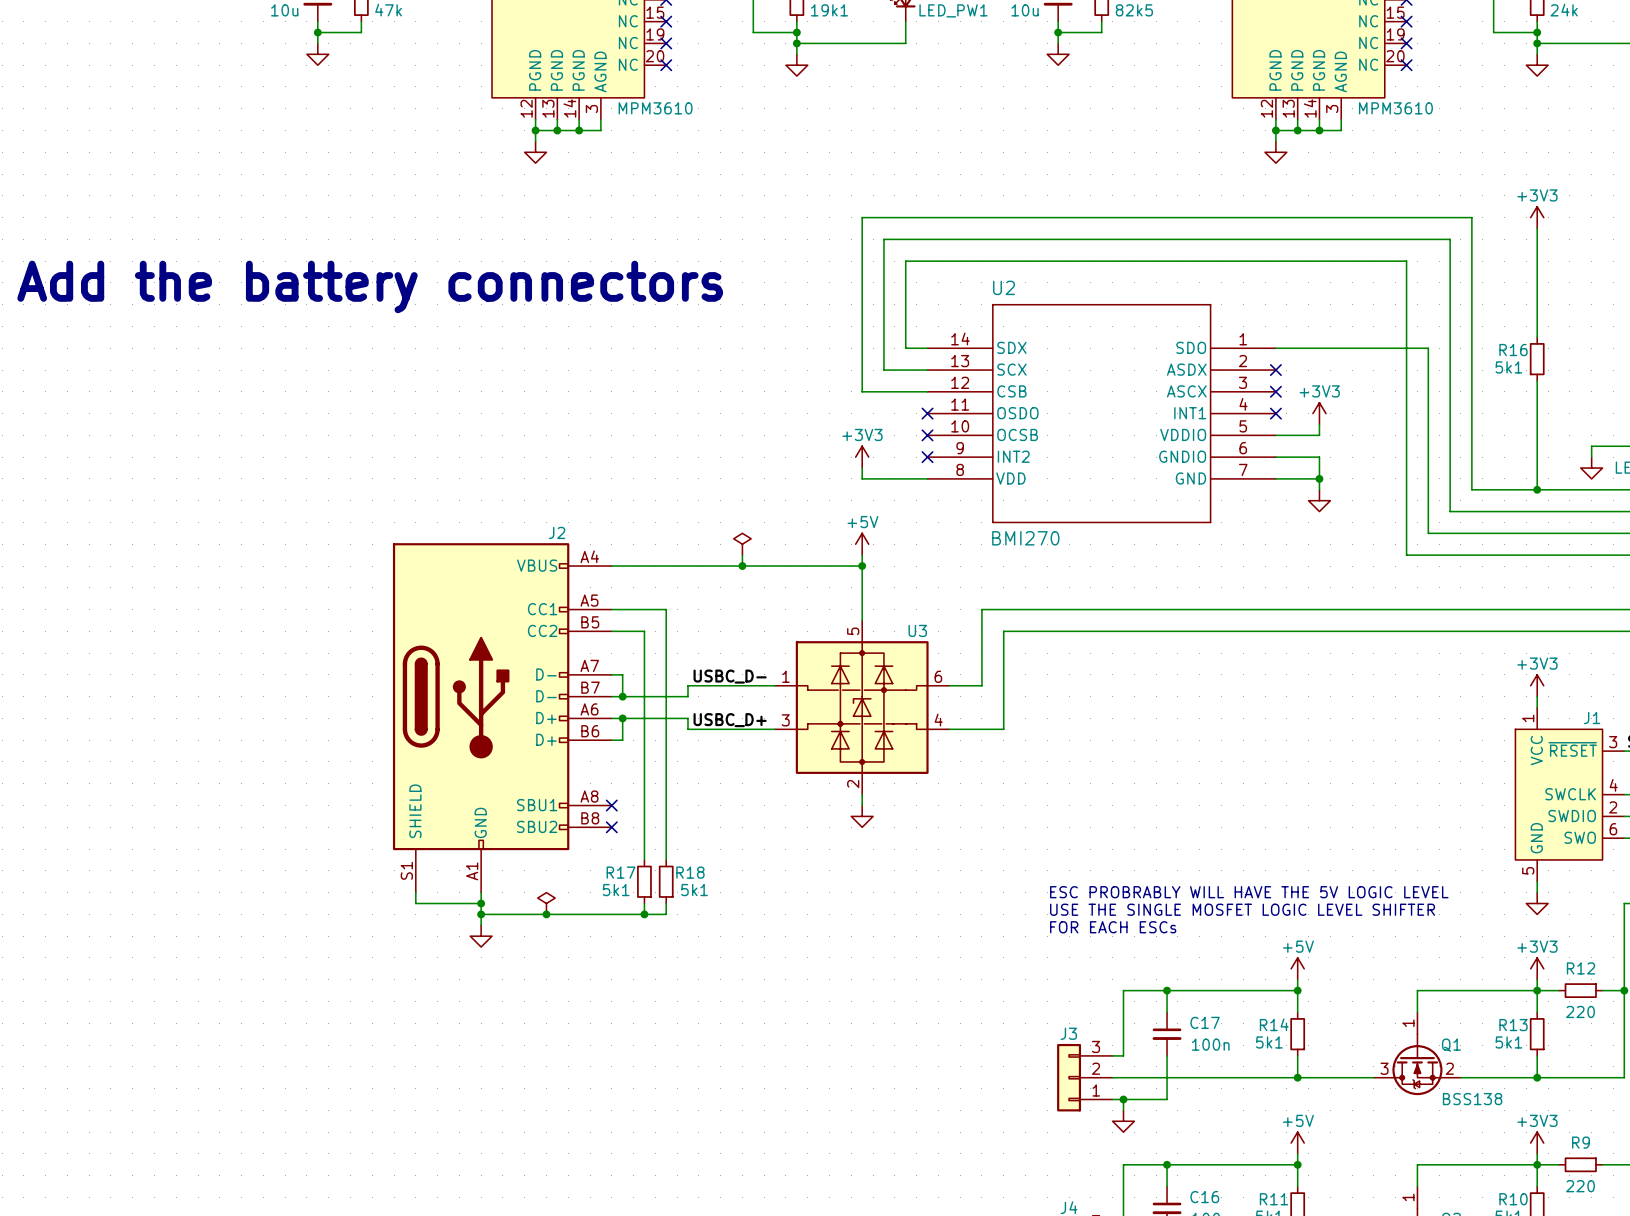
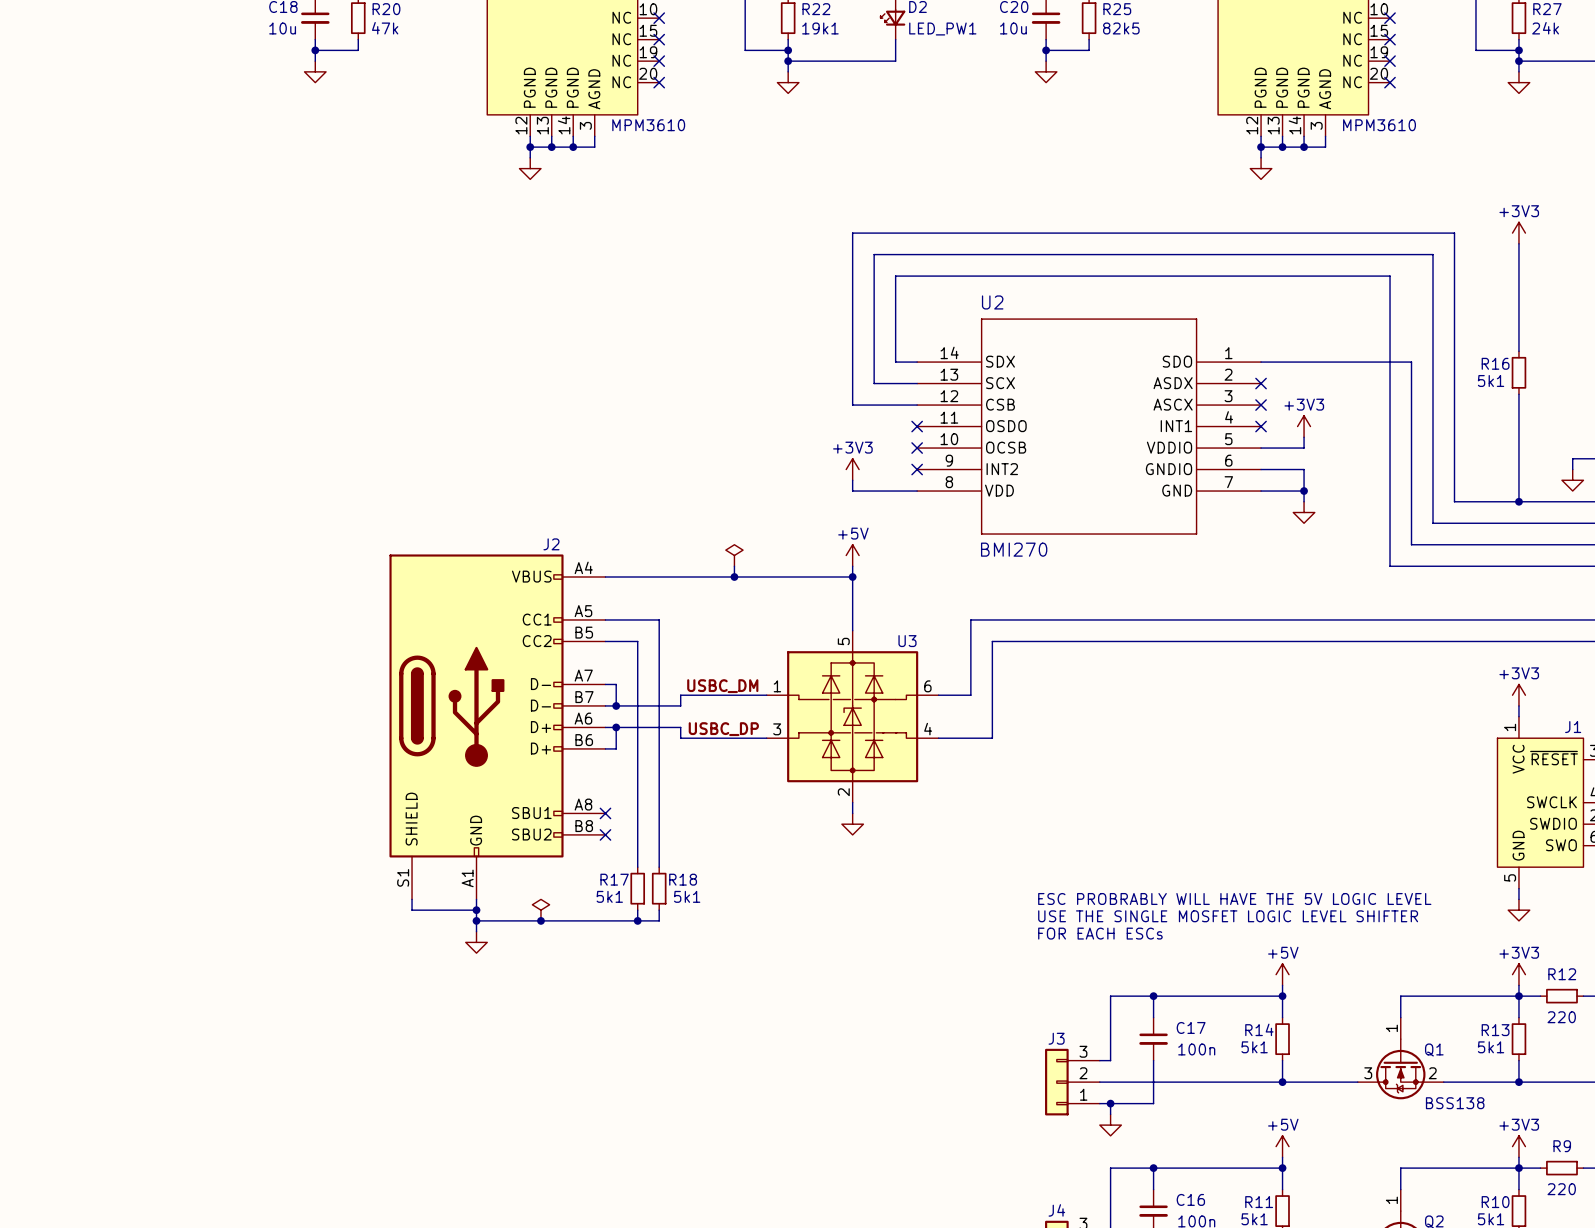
text: Add the battery connectors (370, 286) -> none
label: USBC_D- (730, 676) -> USBC_DM (722, 686)
label: USBC_D+ (730, 720) -> USBC_DP (723, 729)

